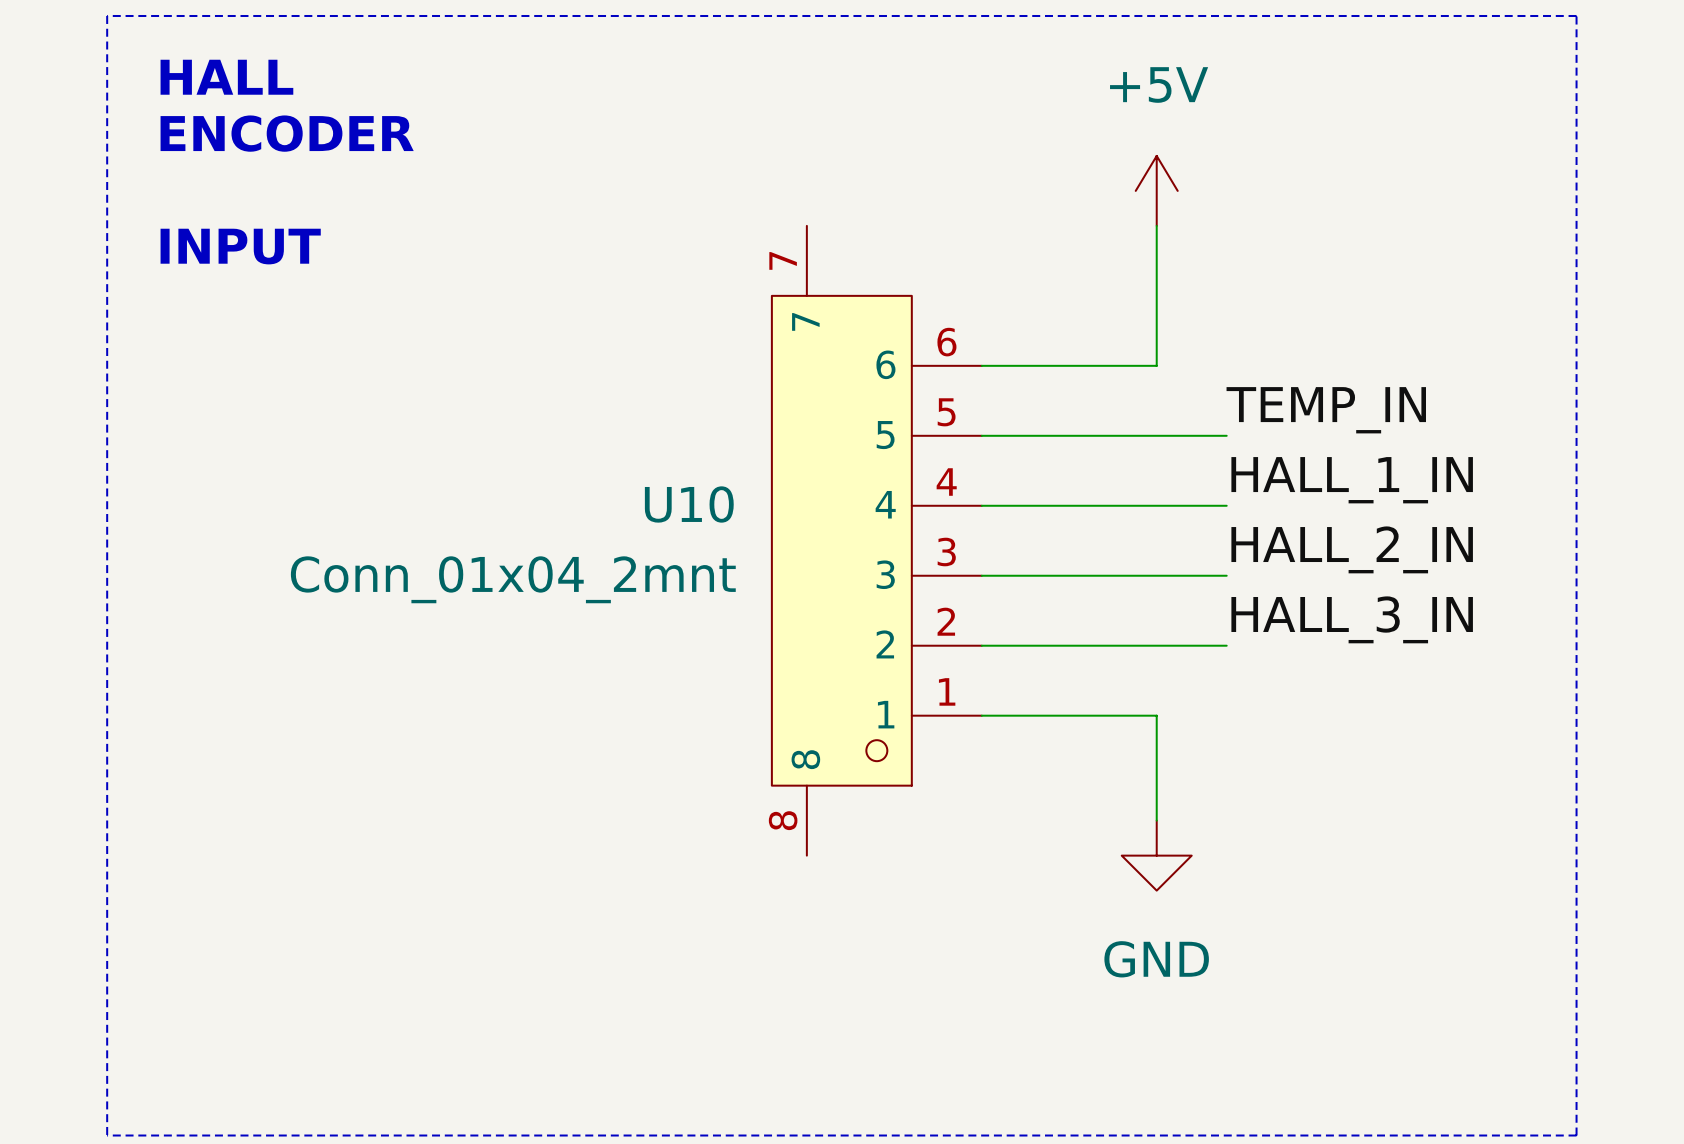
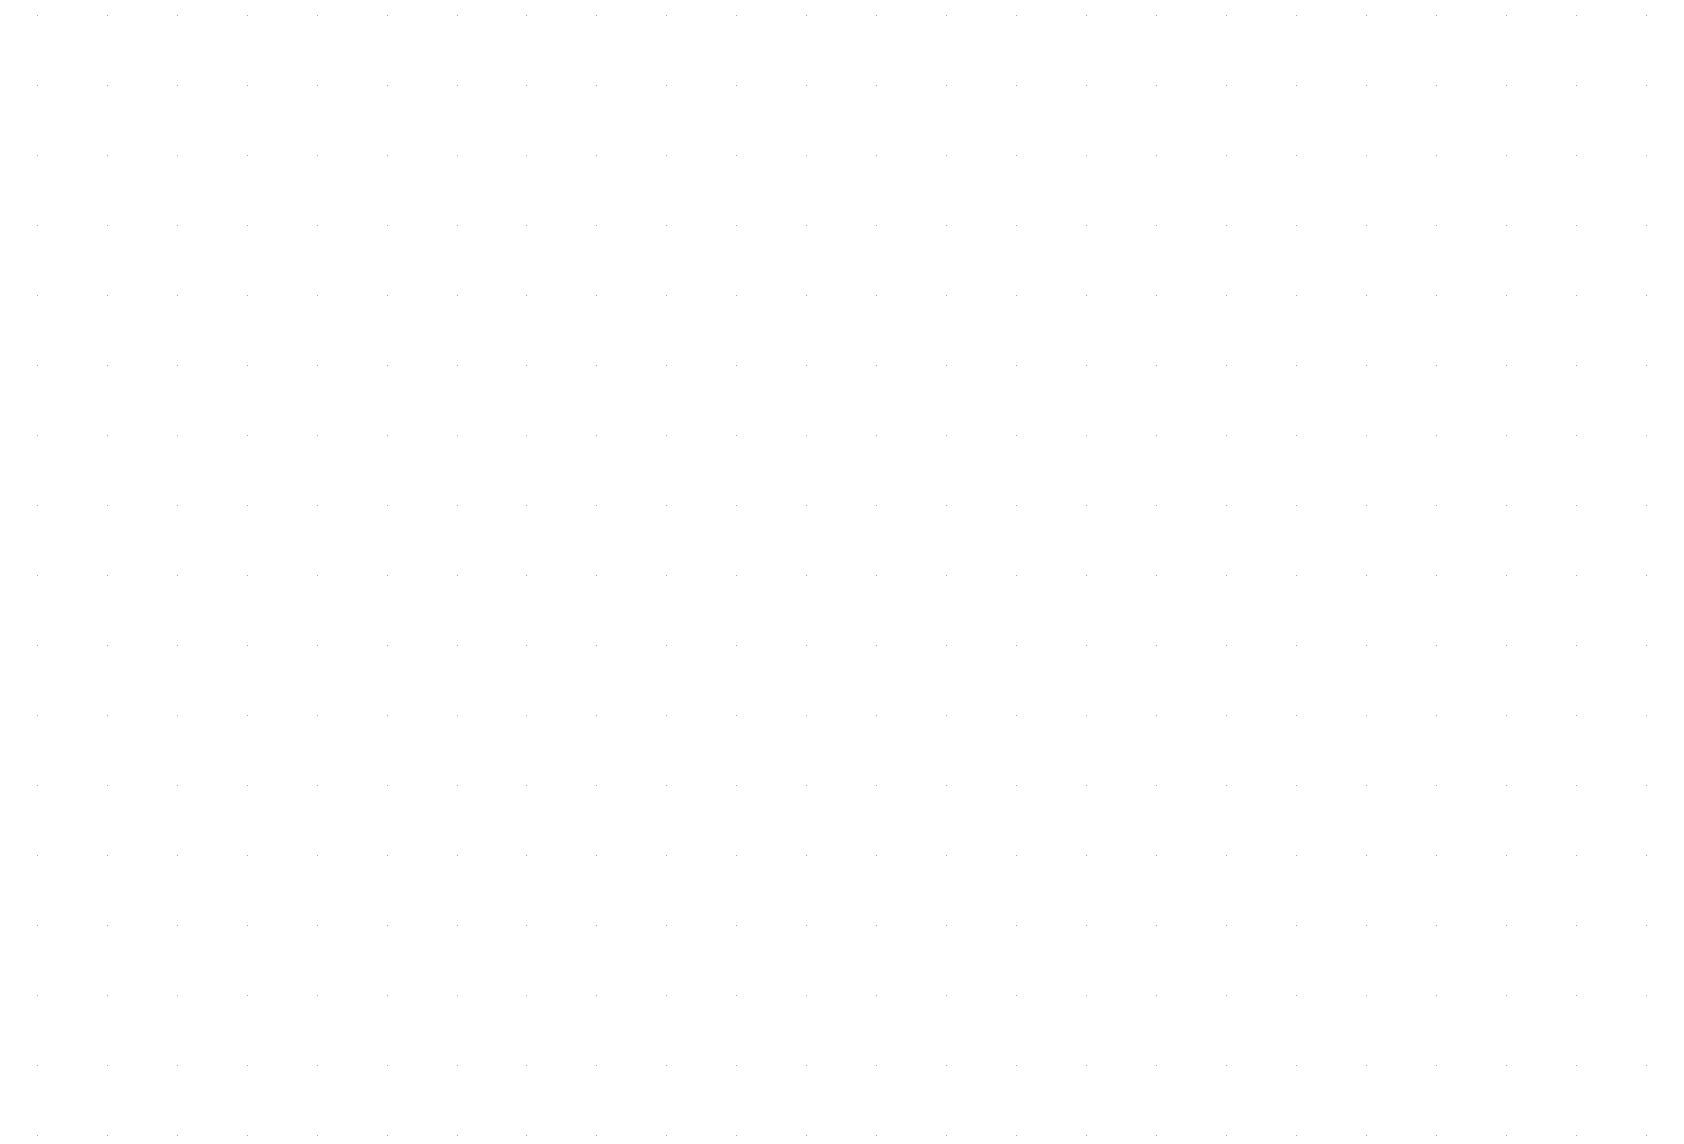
line: (107, 15) (1576, 15) (1576, 1135) (107, 1135) (107, 15) -> none
text: HALL (226, 77) -> none
text: ENCODER (287, 133) -> none
power symbol: +5V (1156, 190) -> none
wire: (1156, 225) (1156, 365) (981, 365) -> none
text: INPUT (240, 246) -> none
label: TEMP_IN (1326, 410) -> none
wire: (981, 435) (1226, 435) -> none
label: HALL_1_IN (1352, 480) -> none
wire: (981, 505) (1226, 505) -> none
U10: Conn_01x04_2mnt (876, 540) -> none
label: HALL_2_IN (1352, 549) -> none
wire: (981, 575) (1226, 575) -> none
label: HALL_3_IN (1352, 619) -> none
wire: (981, 645) (1226, 645) -> none
wire: (981, 715) (1156, 715) (1156, 820) -> none
power symbol: GND (1156, 855) -> none

